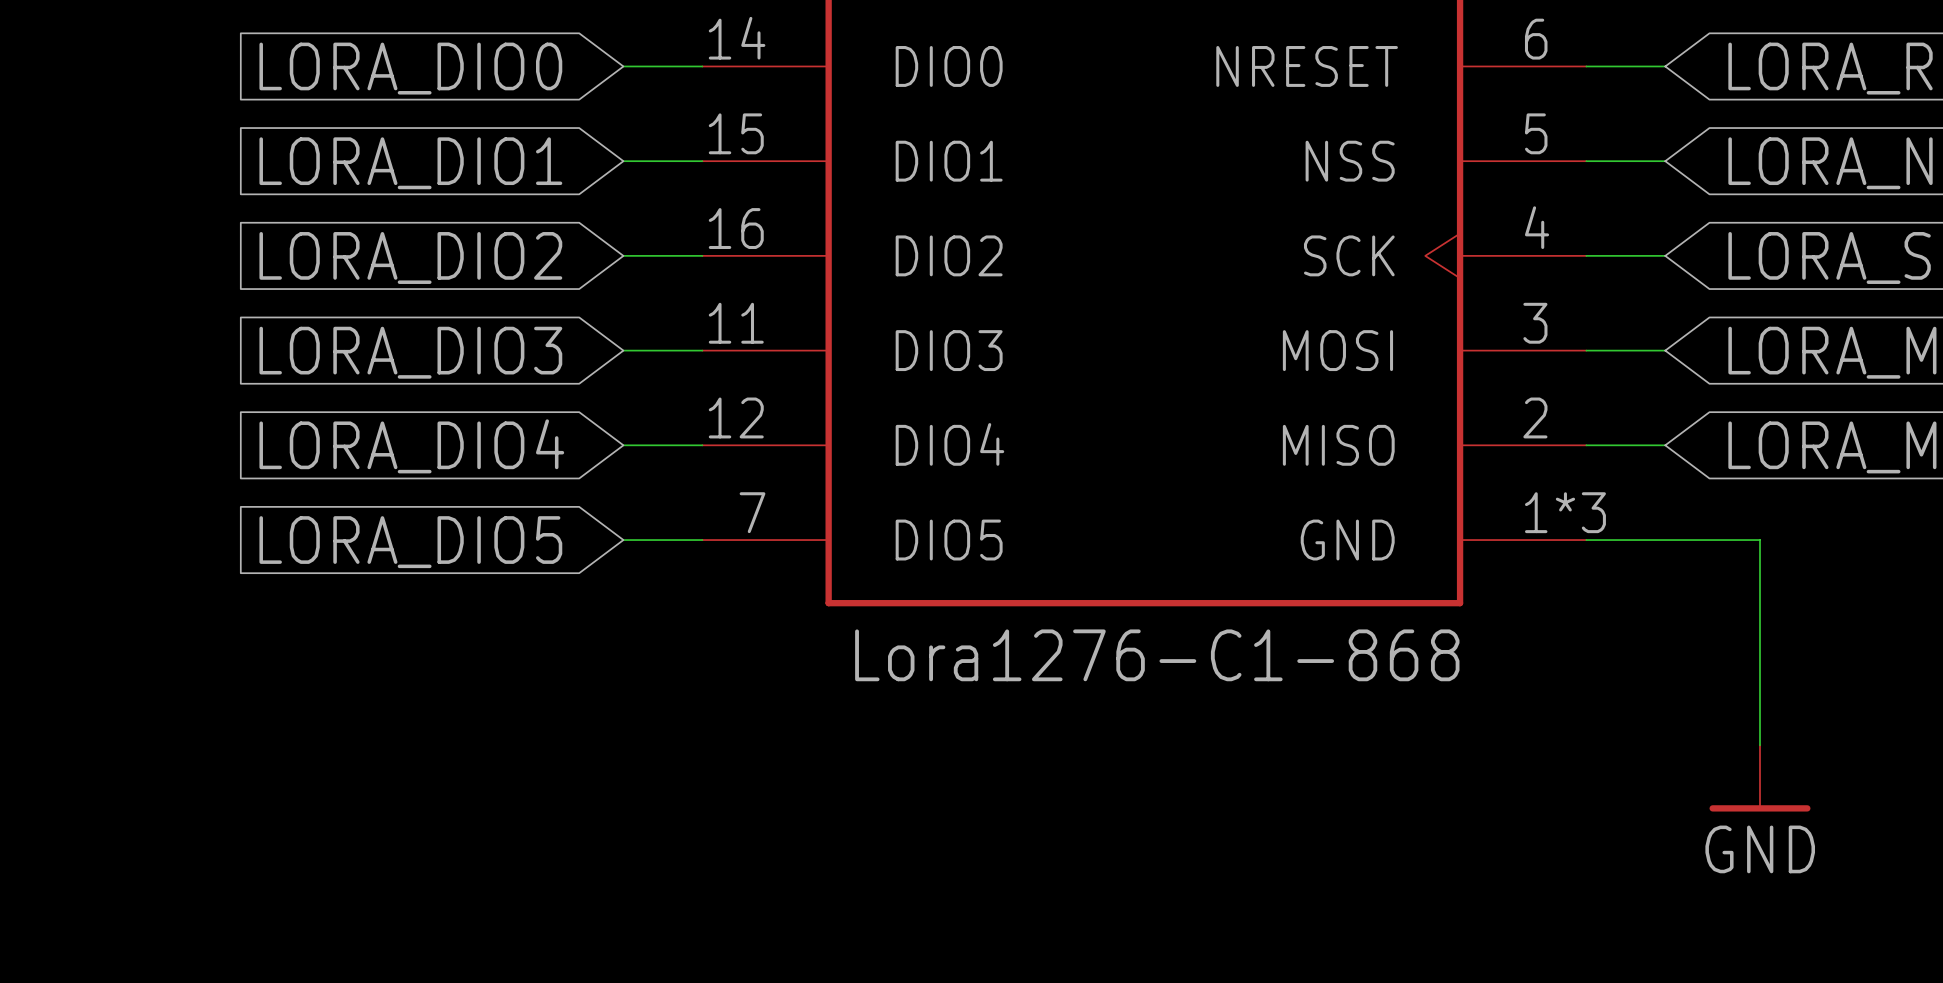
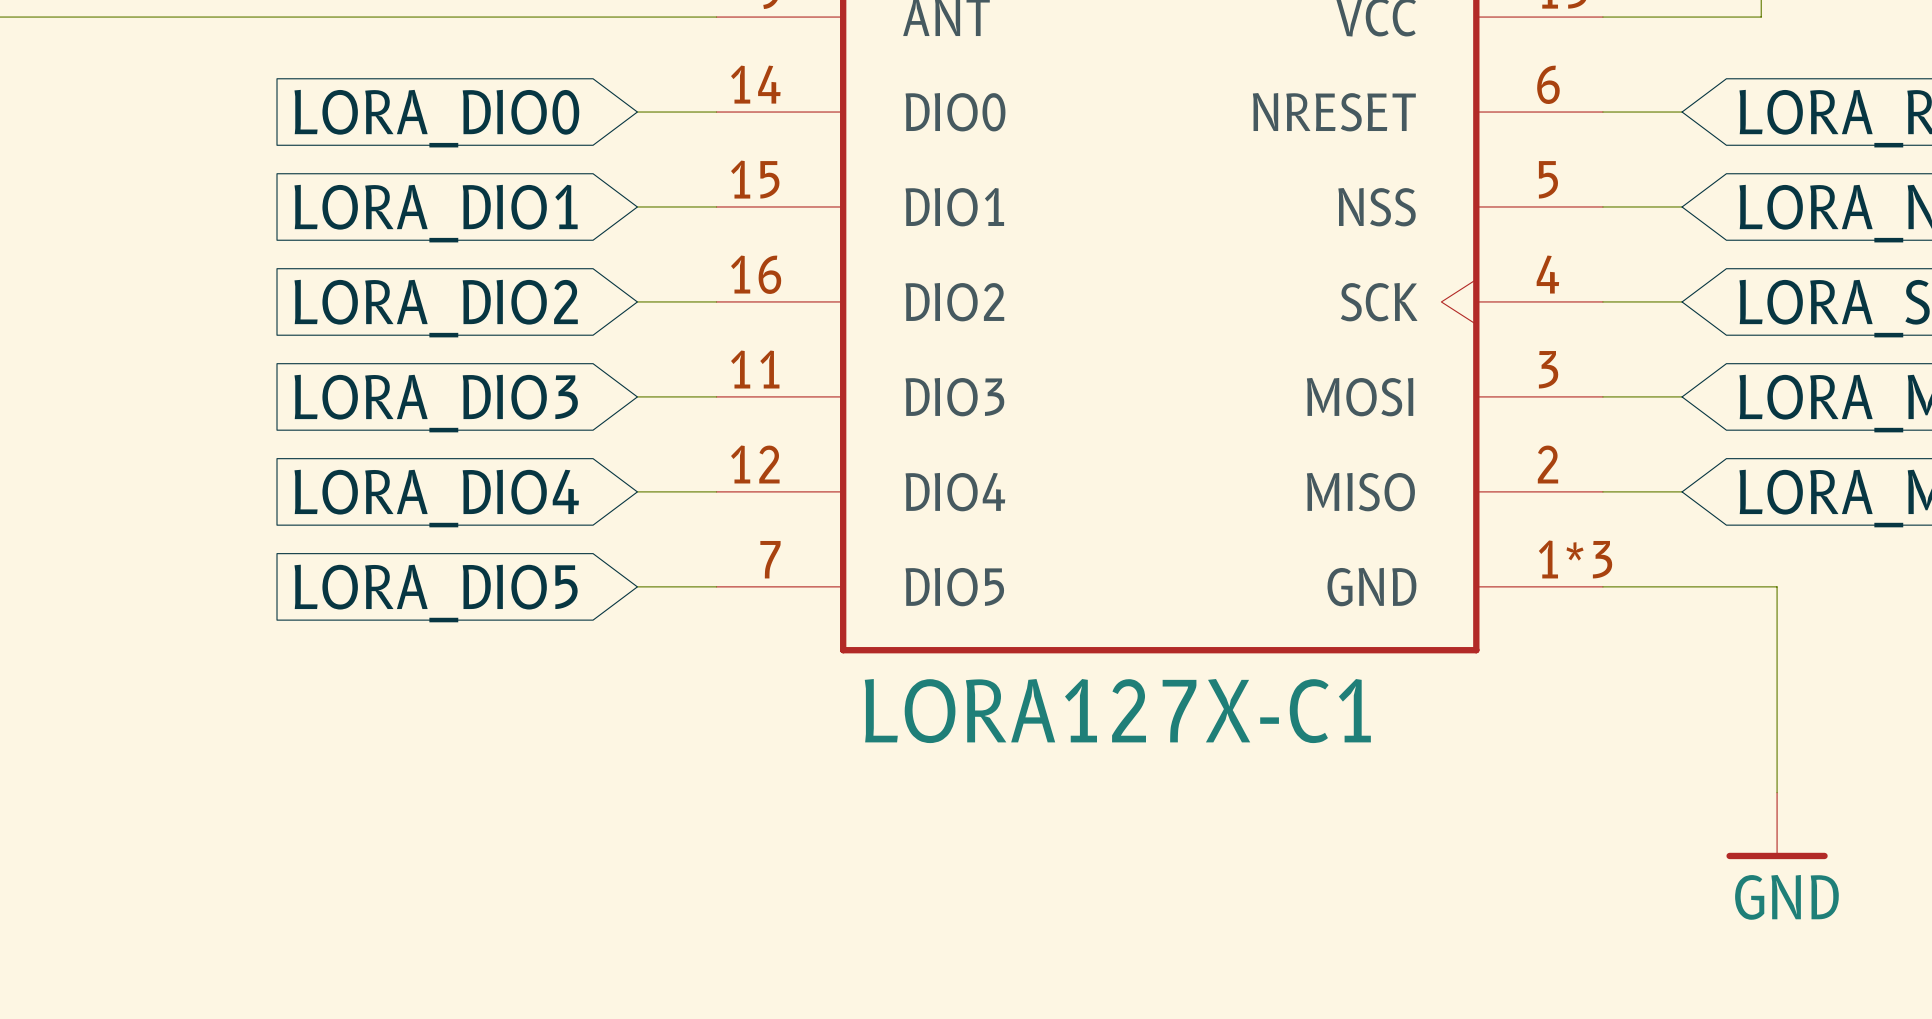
part value: Lora1276-C1-868 (1157, 655) -> LORA127X-C1 (1117, 711)

